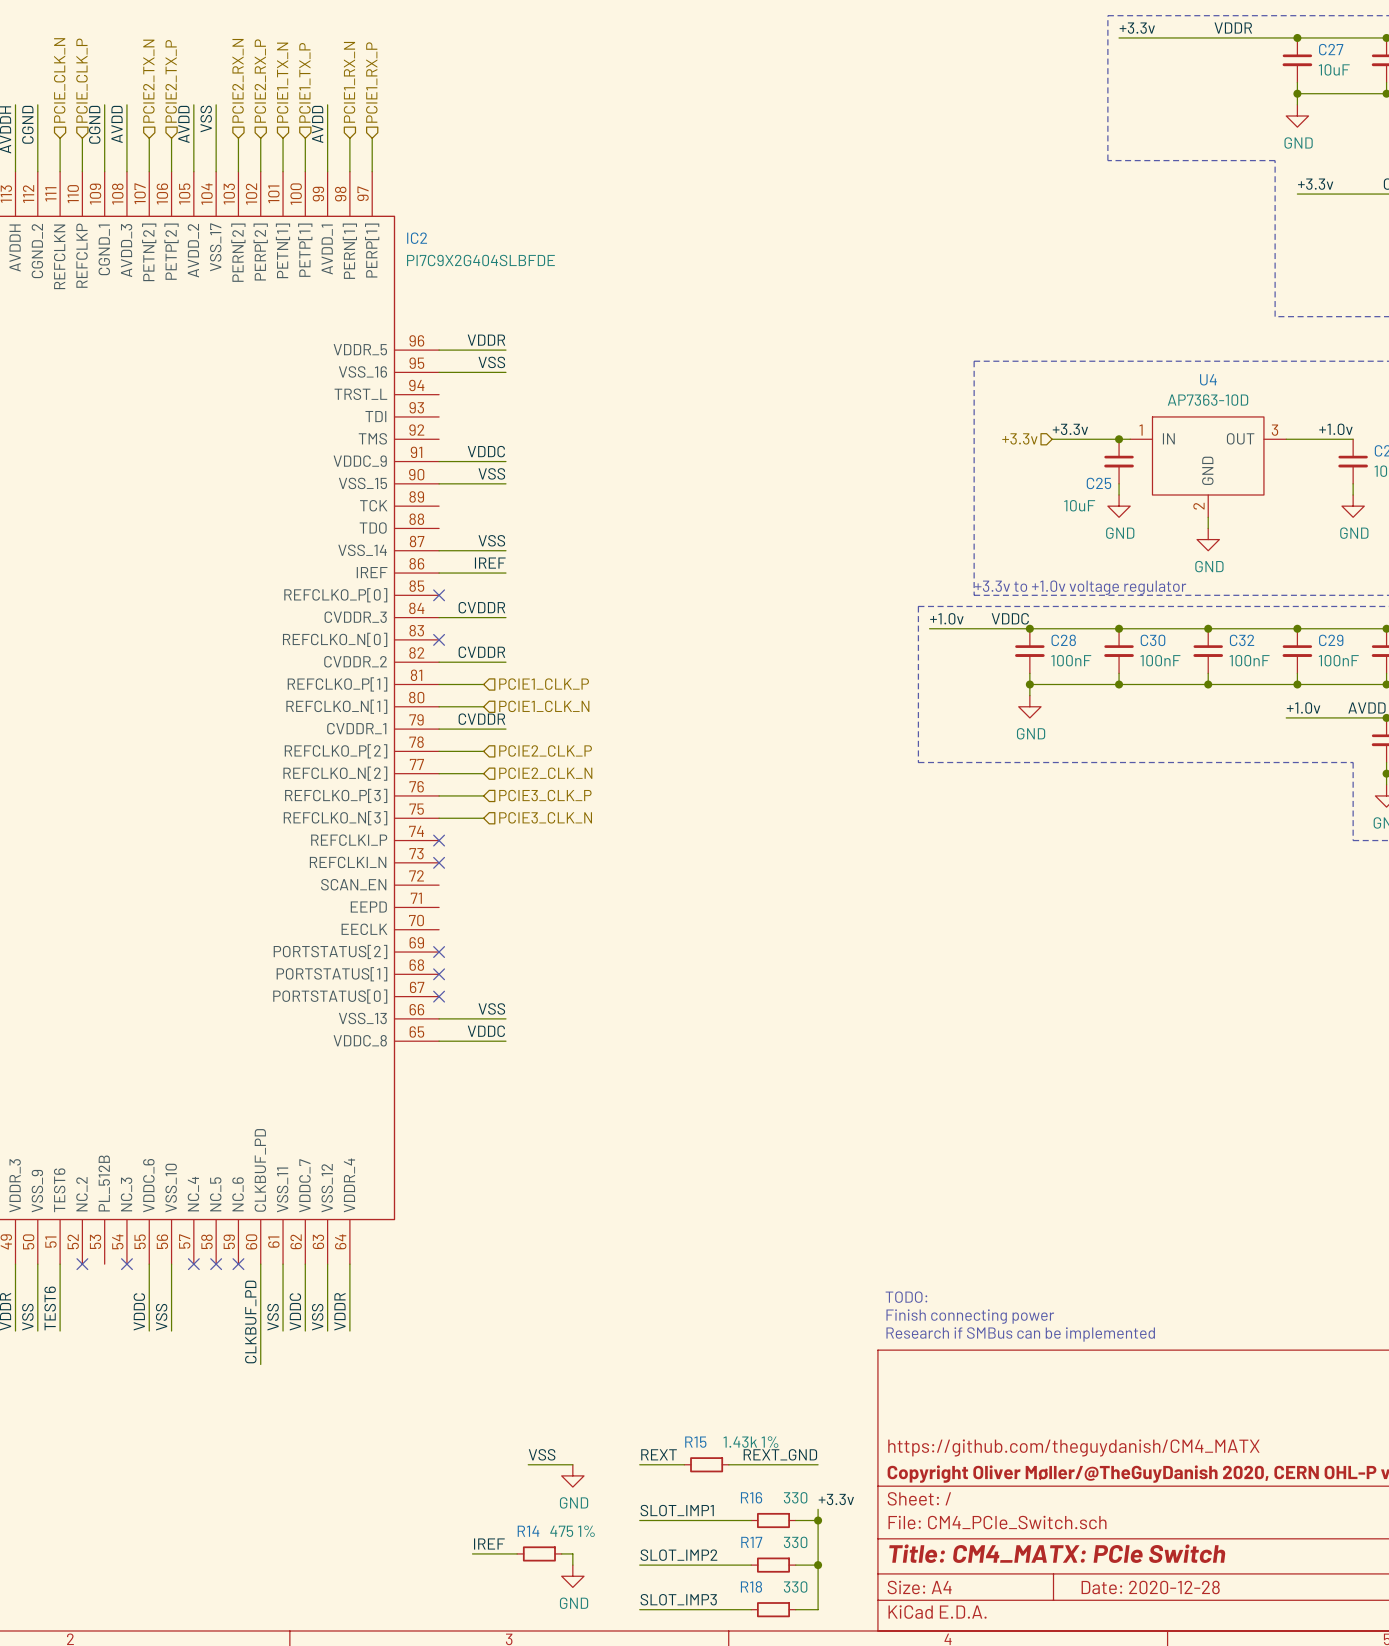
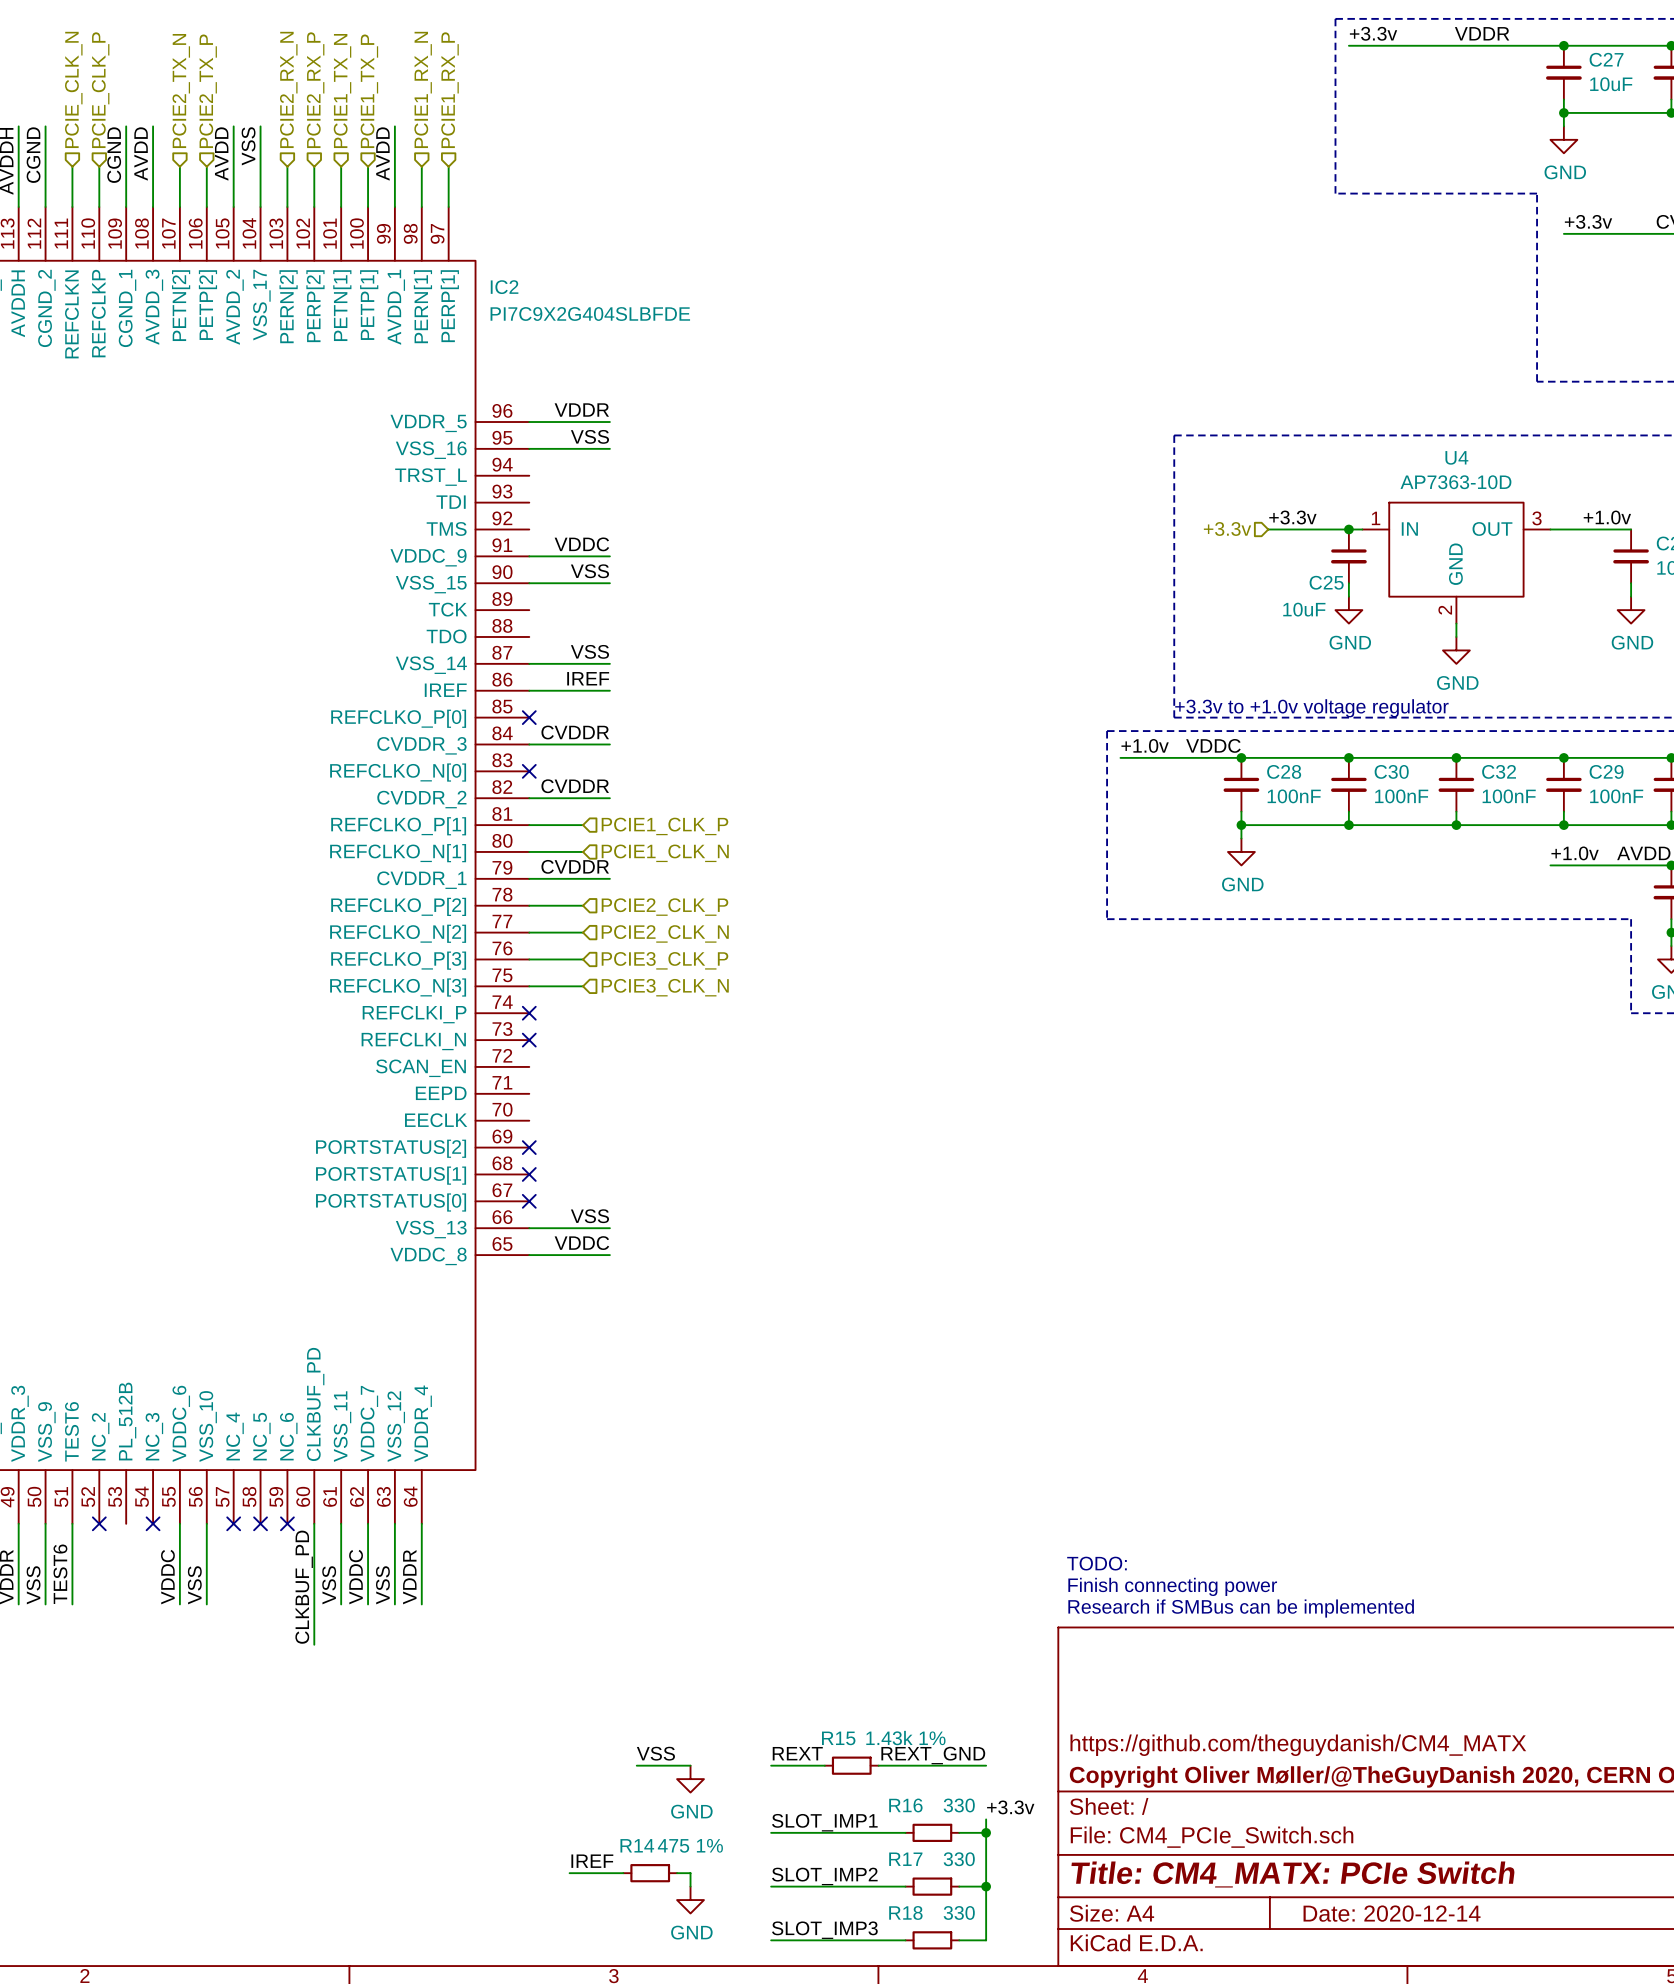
title block: Date: 2020-12-28 (1150, 1587) -> Date: 2020-12-14 (1392, 1913)

